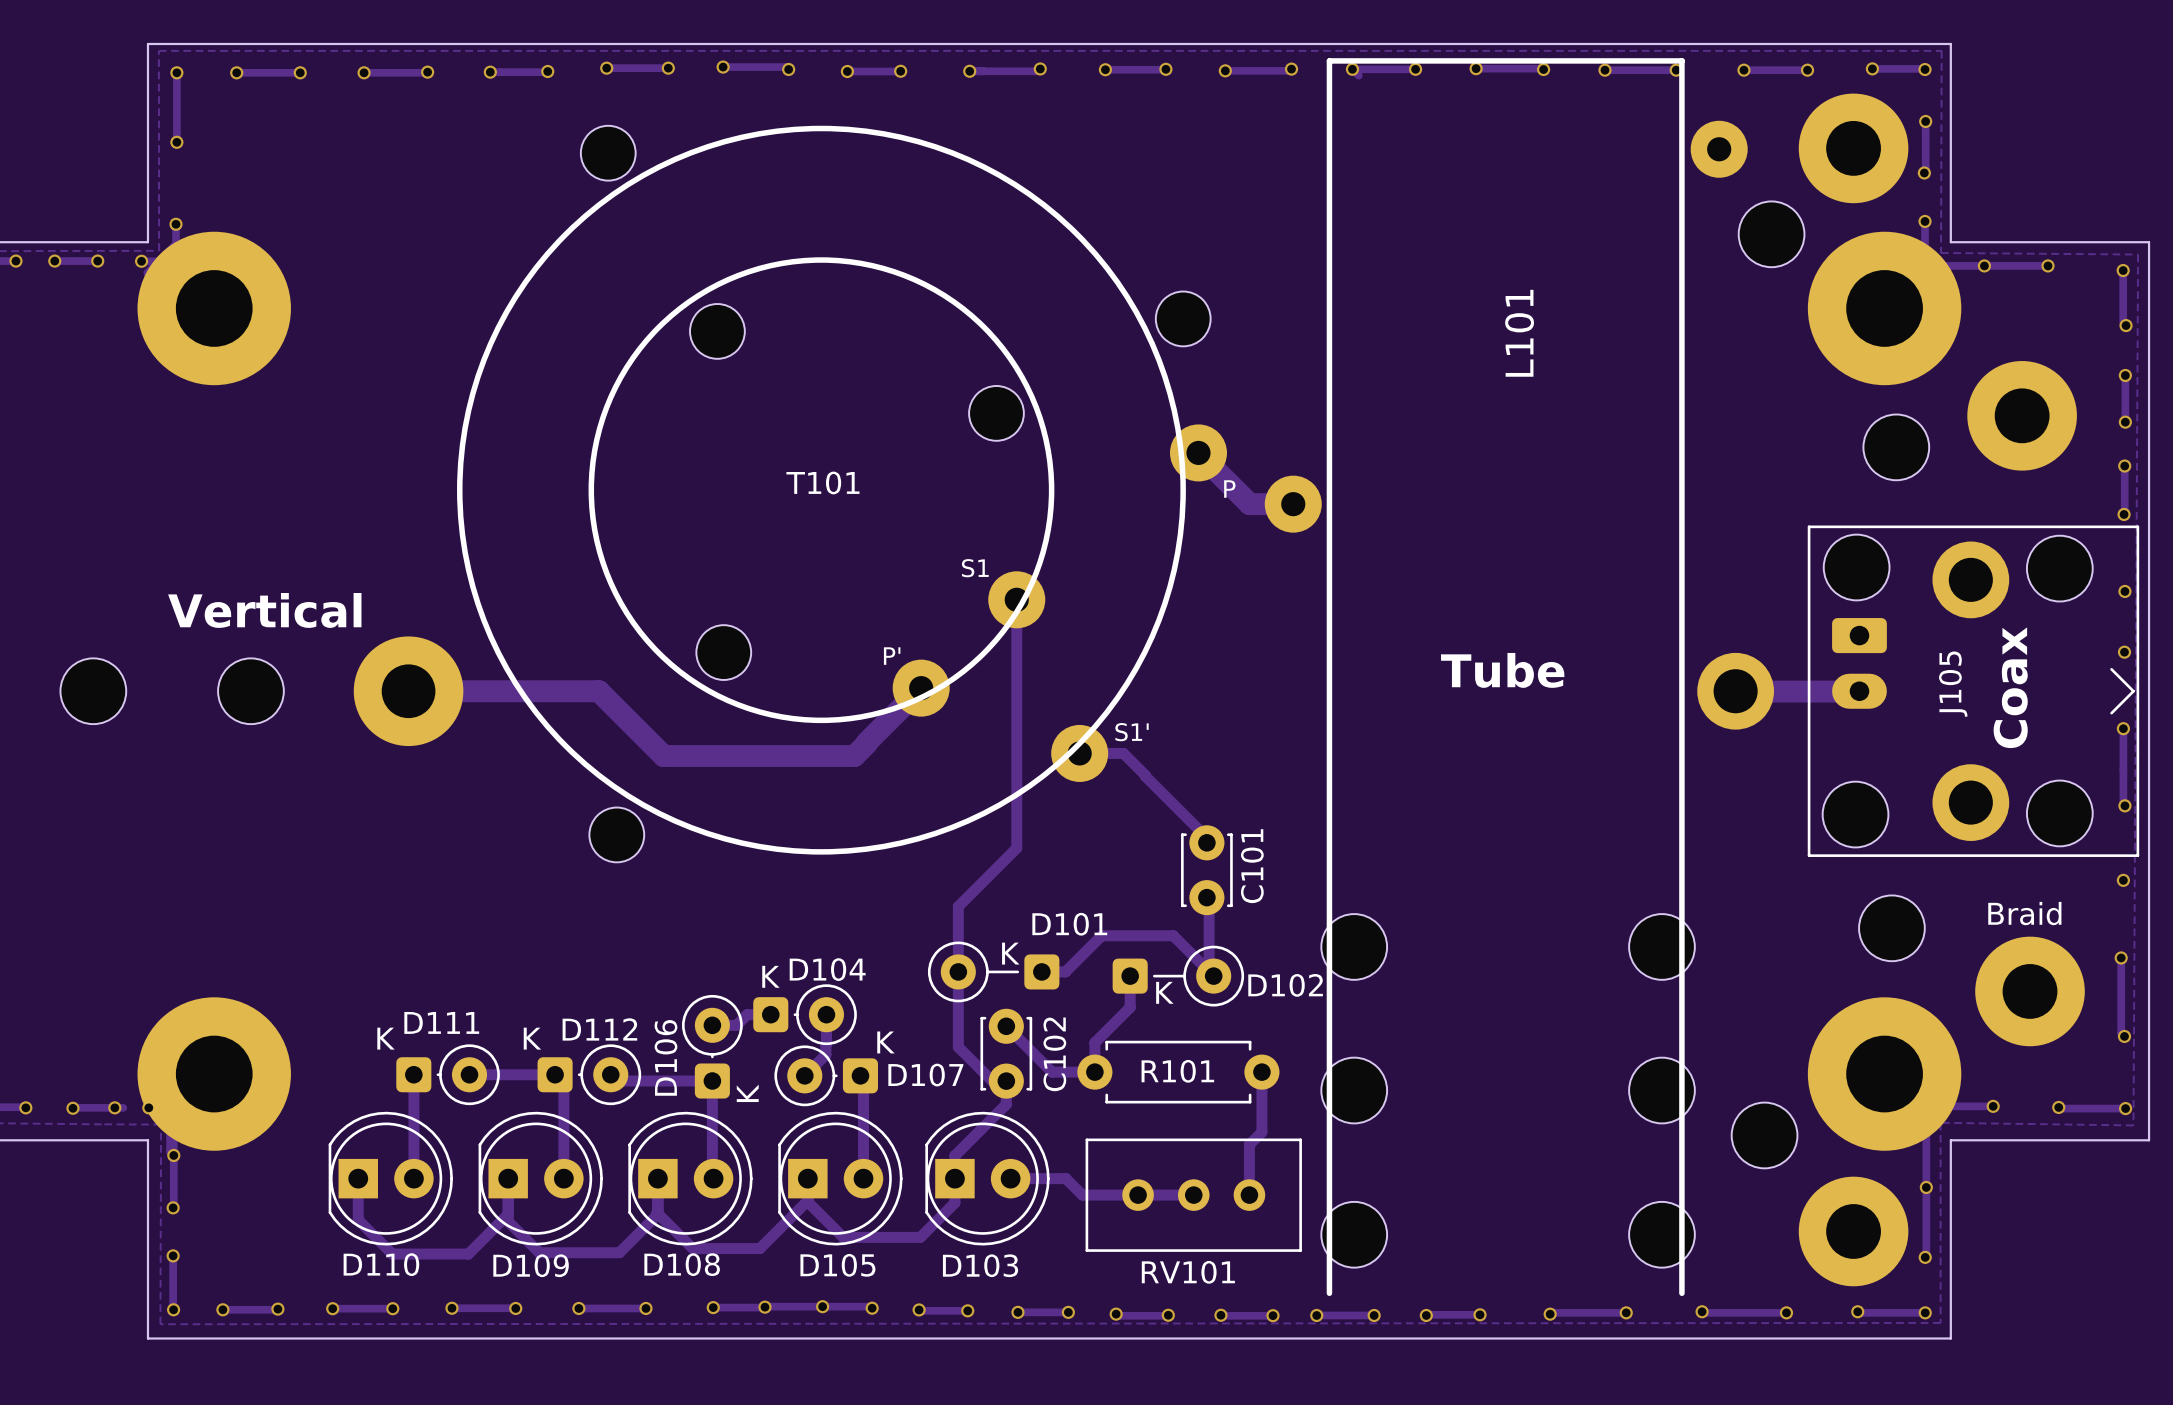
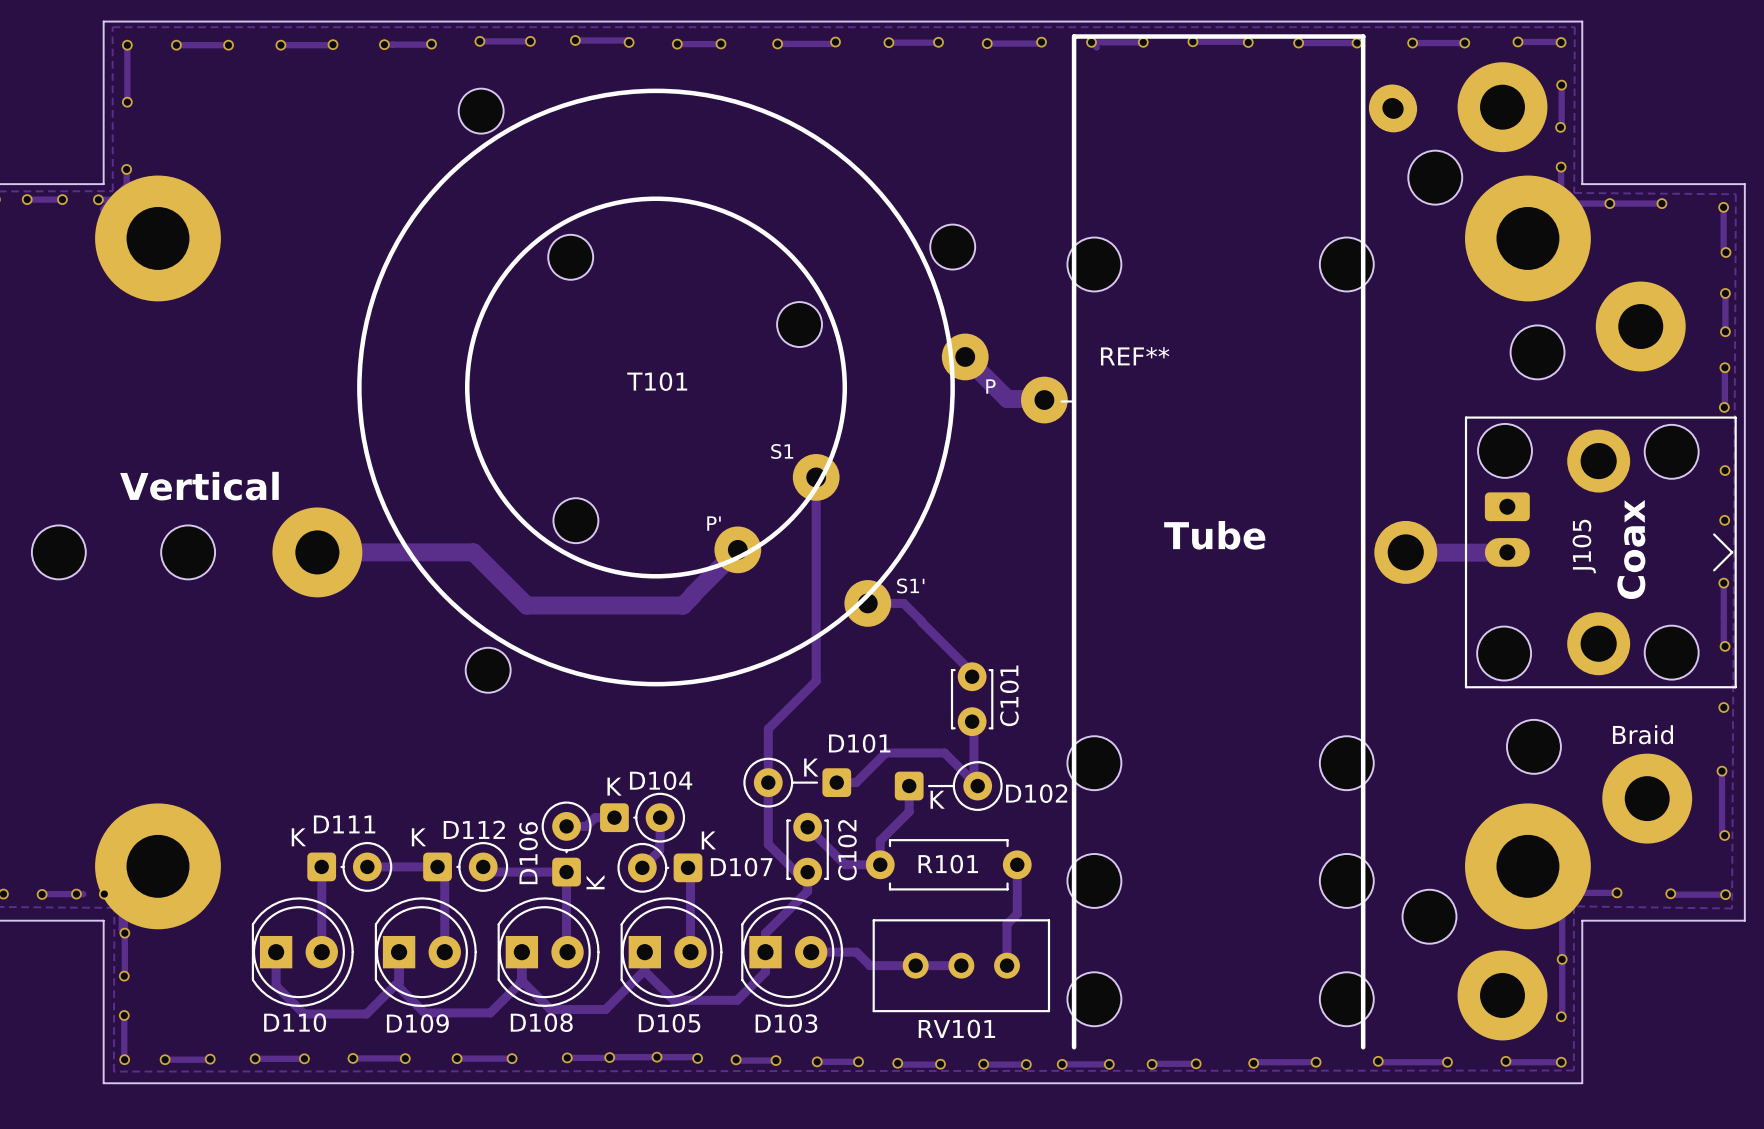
line: (1681, 60) (1681, 1293) -> none
line: (1682, 60) (1329, 60) (1329, 1293) -> none
L101: (1519, 333) -> none
part: (1293, 504) -> none
REF**: none -> (1219, 541)
part: (1354, 946) -> none
part: (1661, 946) -> none
part: (1354, 1090) -> none
part: (1661, 1090) -> none
part: (1354, 1234) -> none
part: (1661, 1234) -> none

